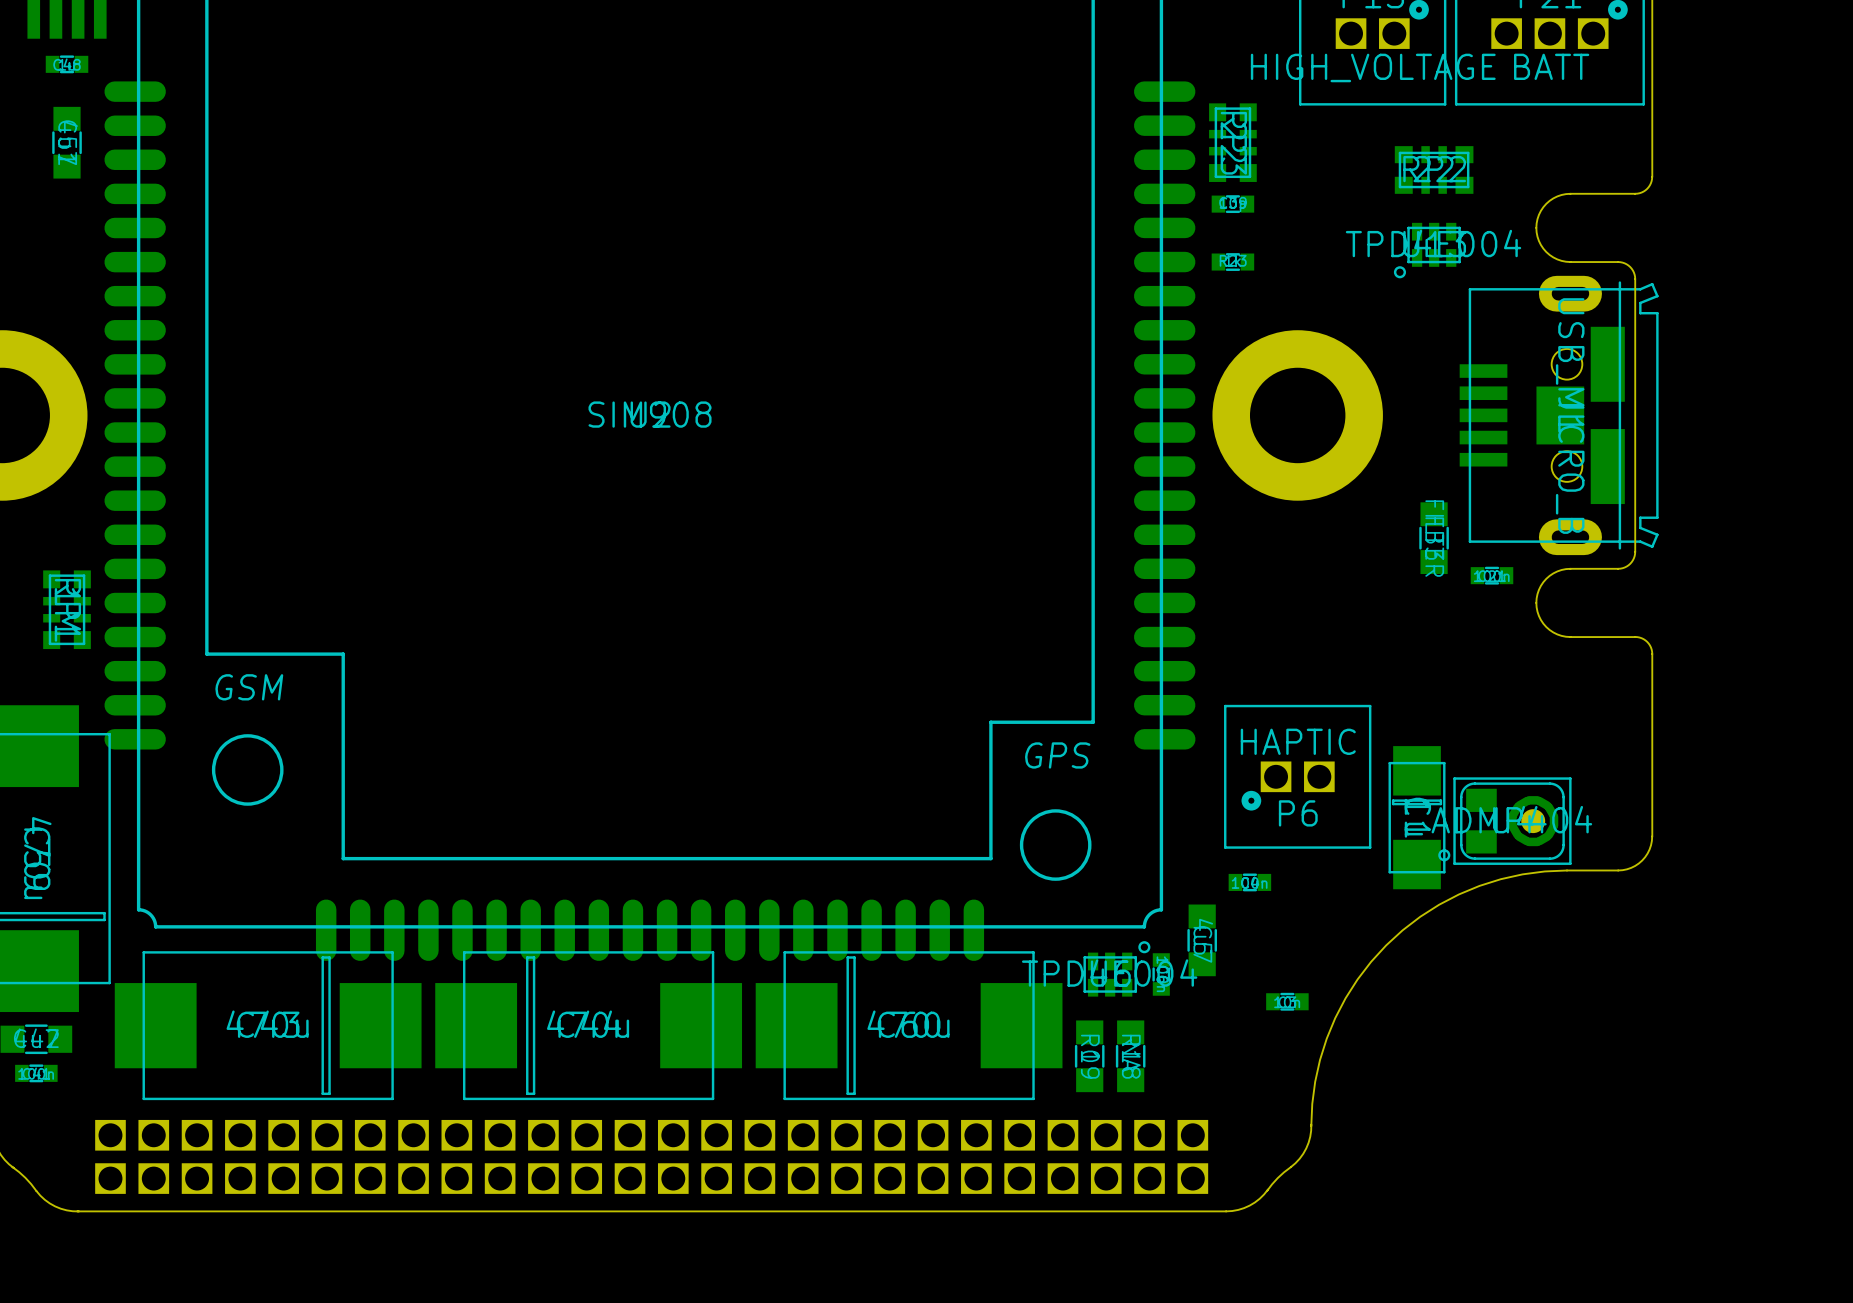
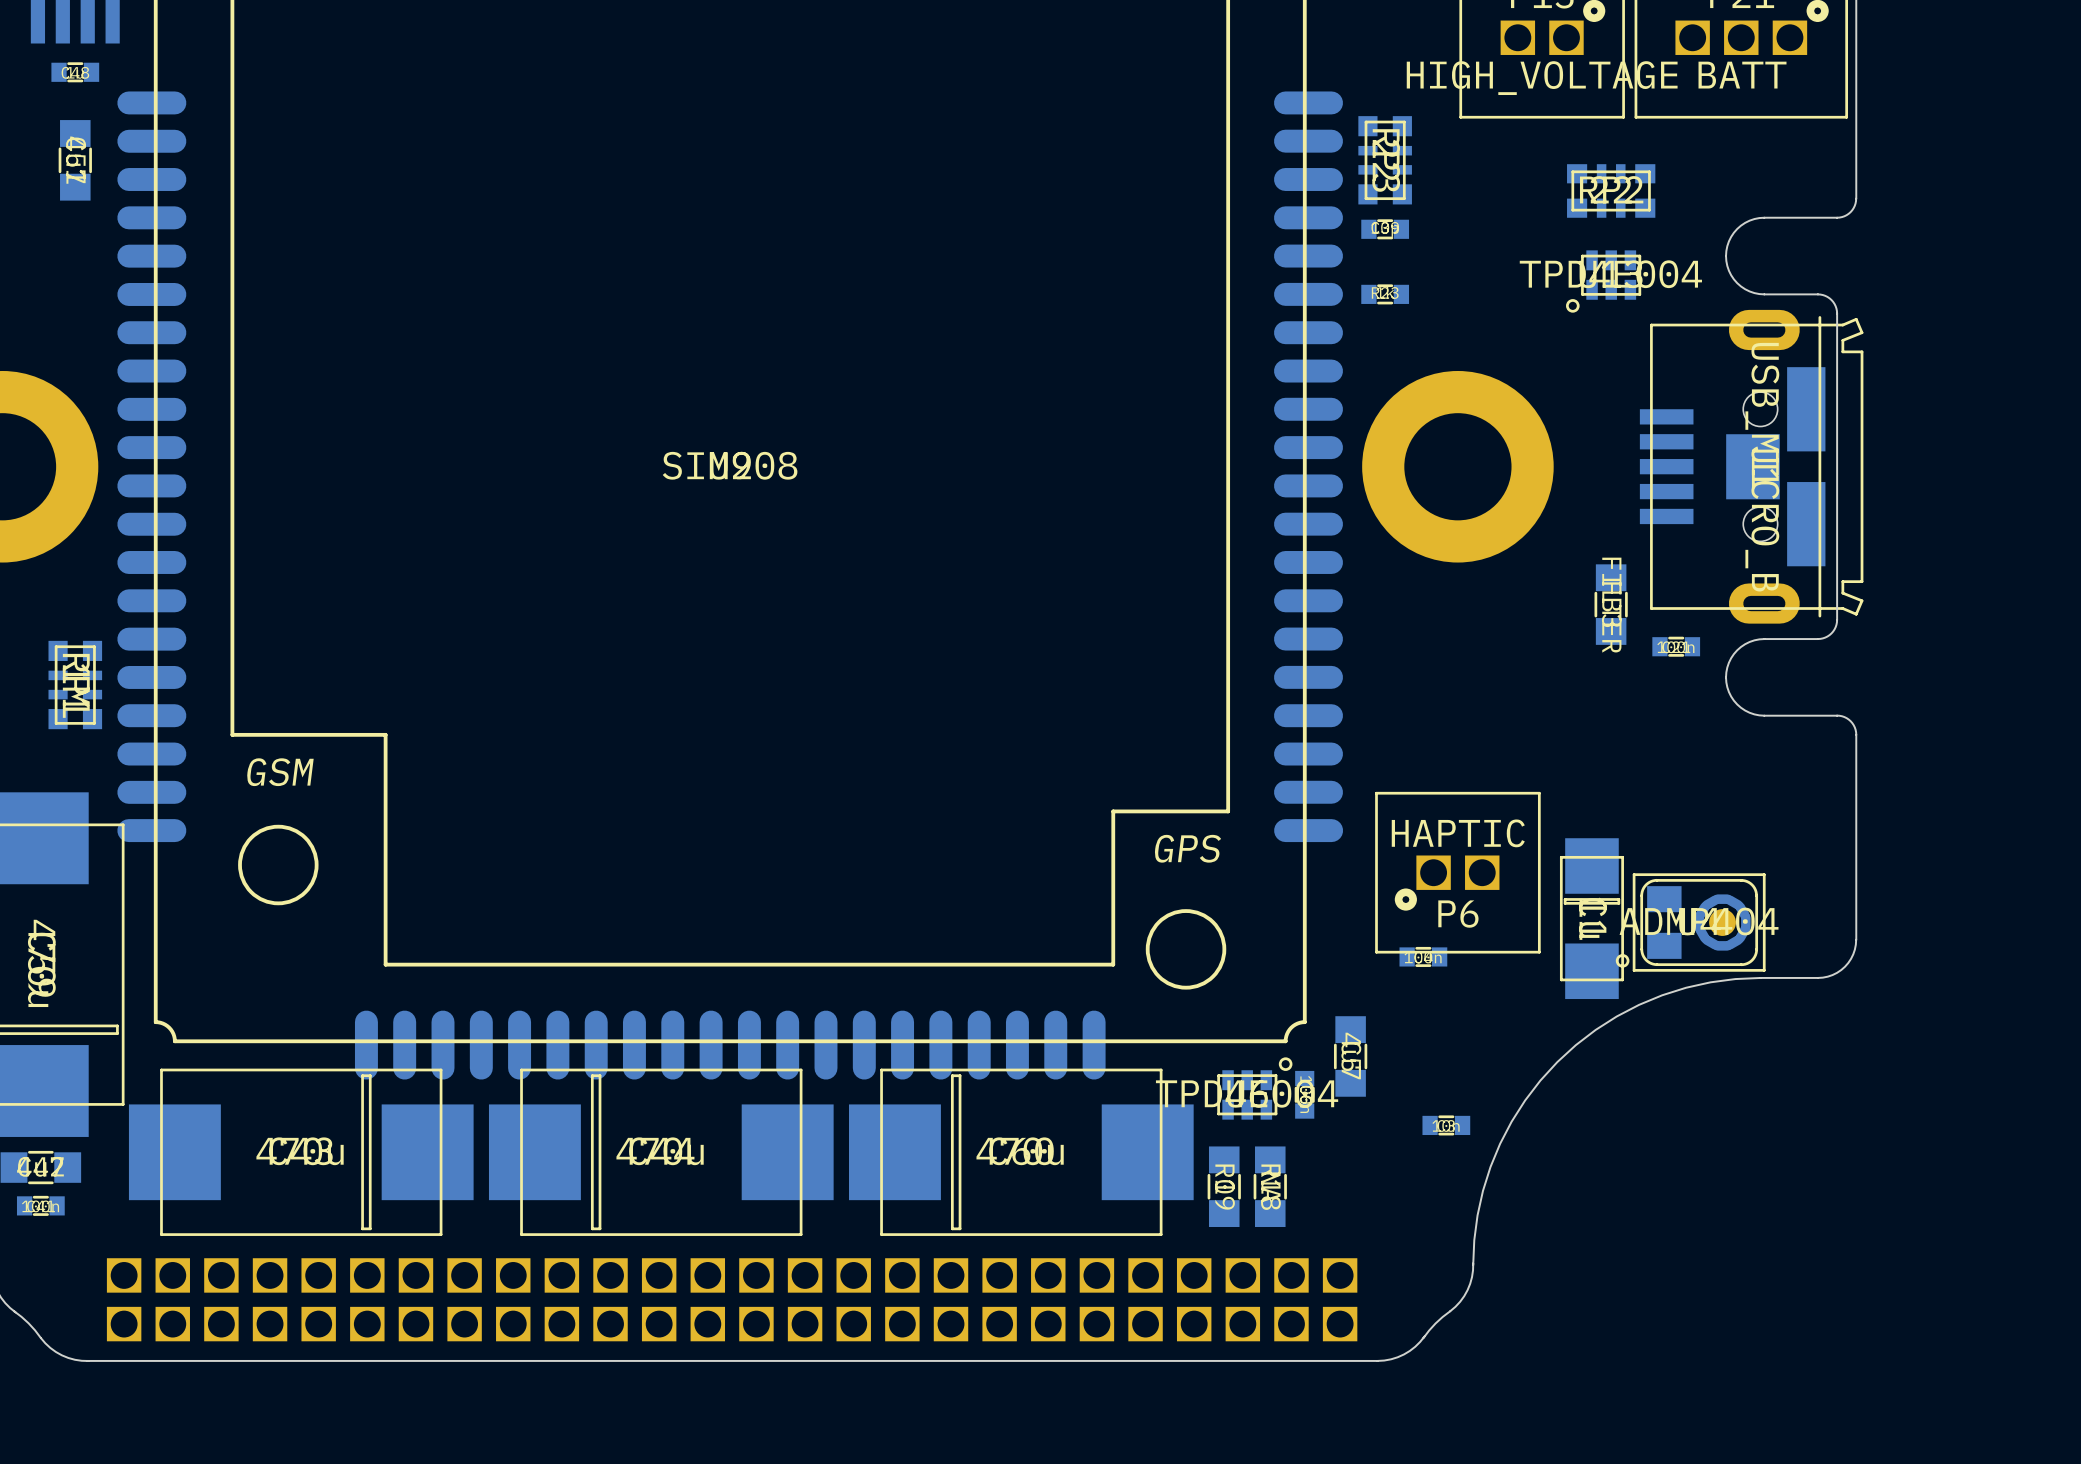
part position: (1249, 882) -> (1423, 956)

